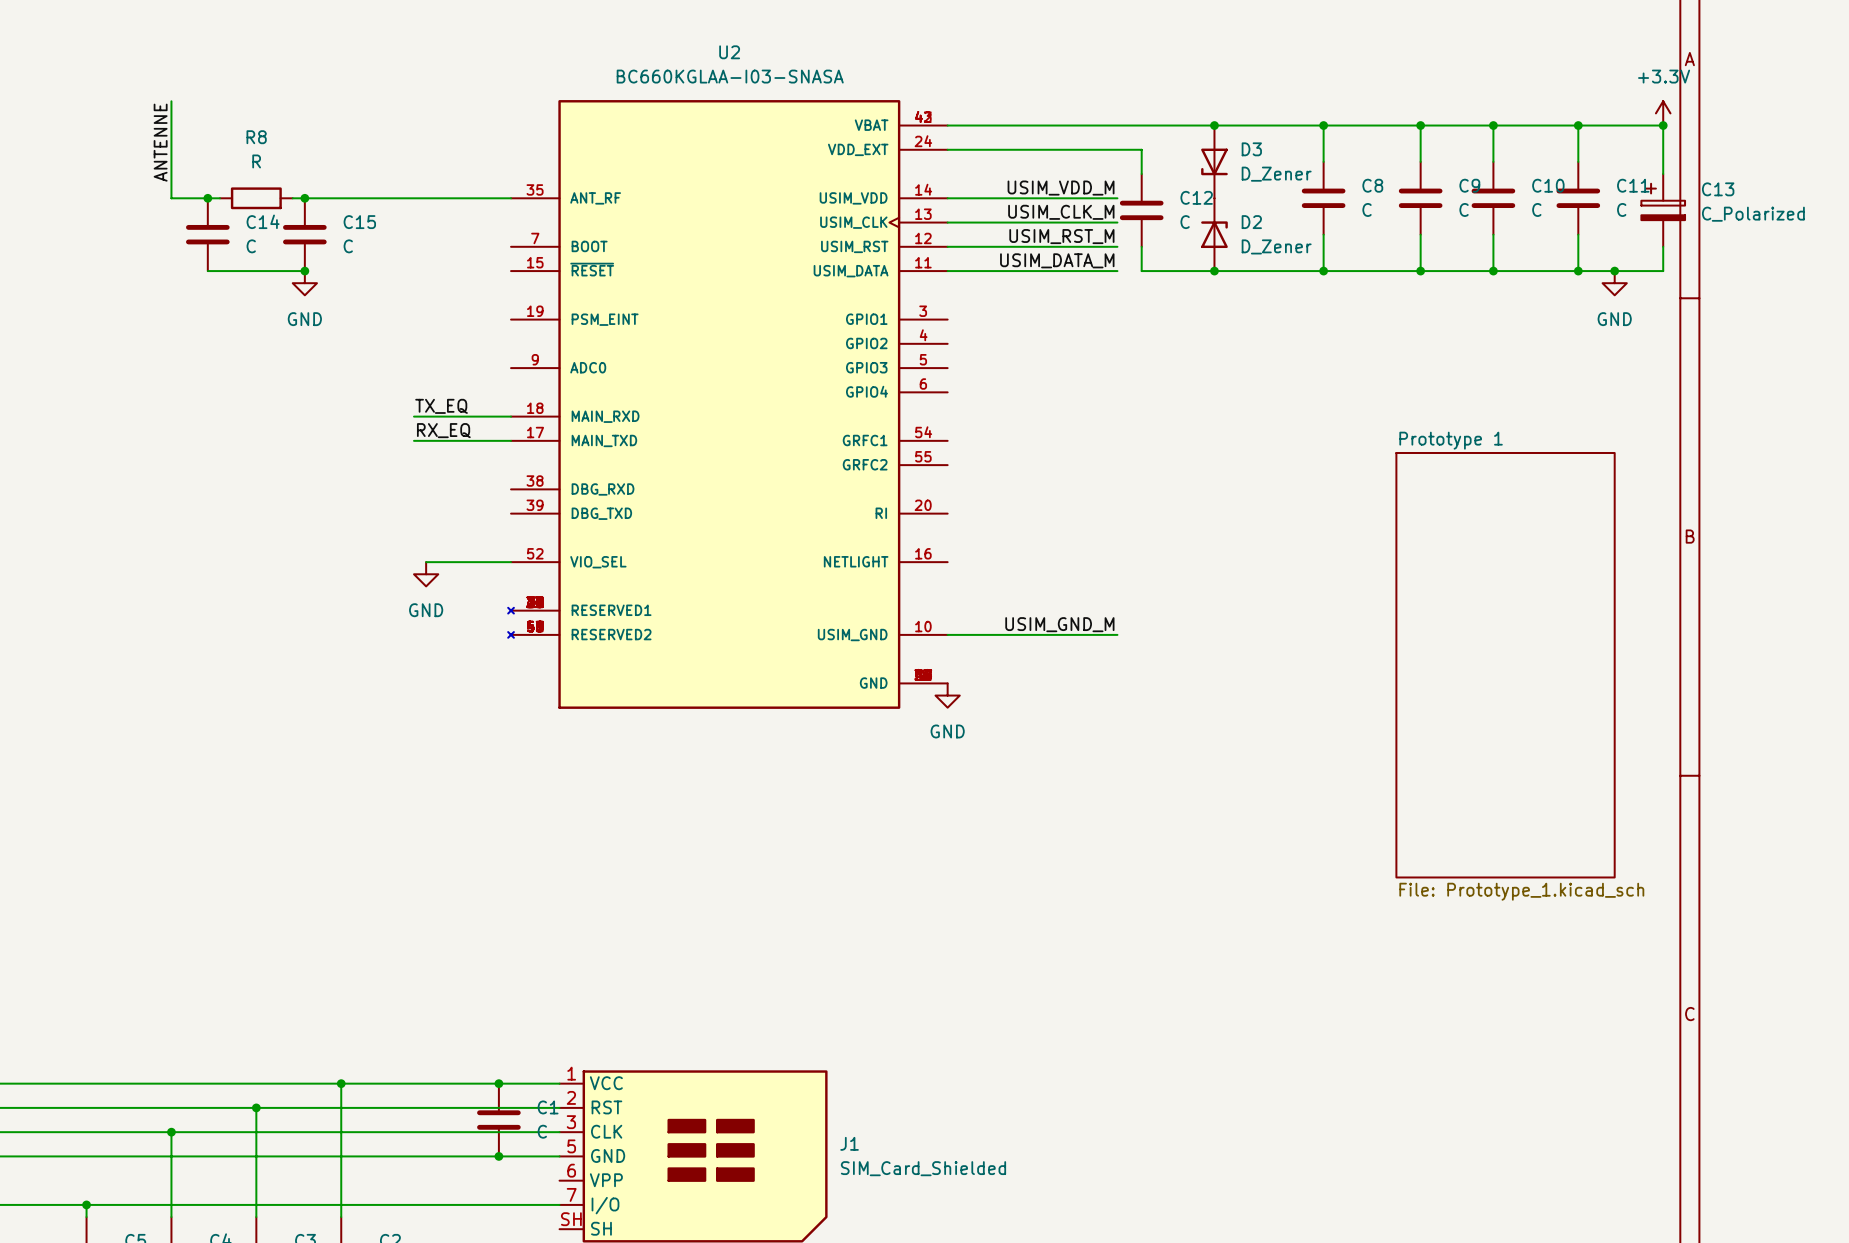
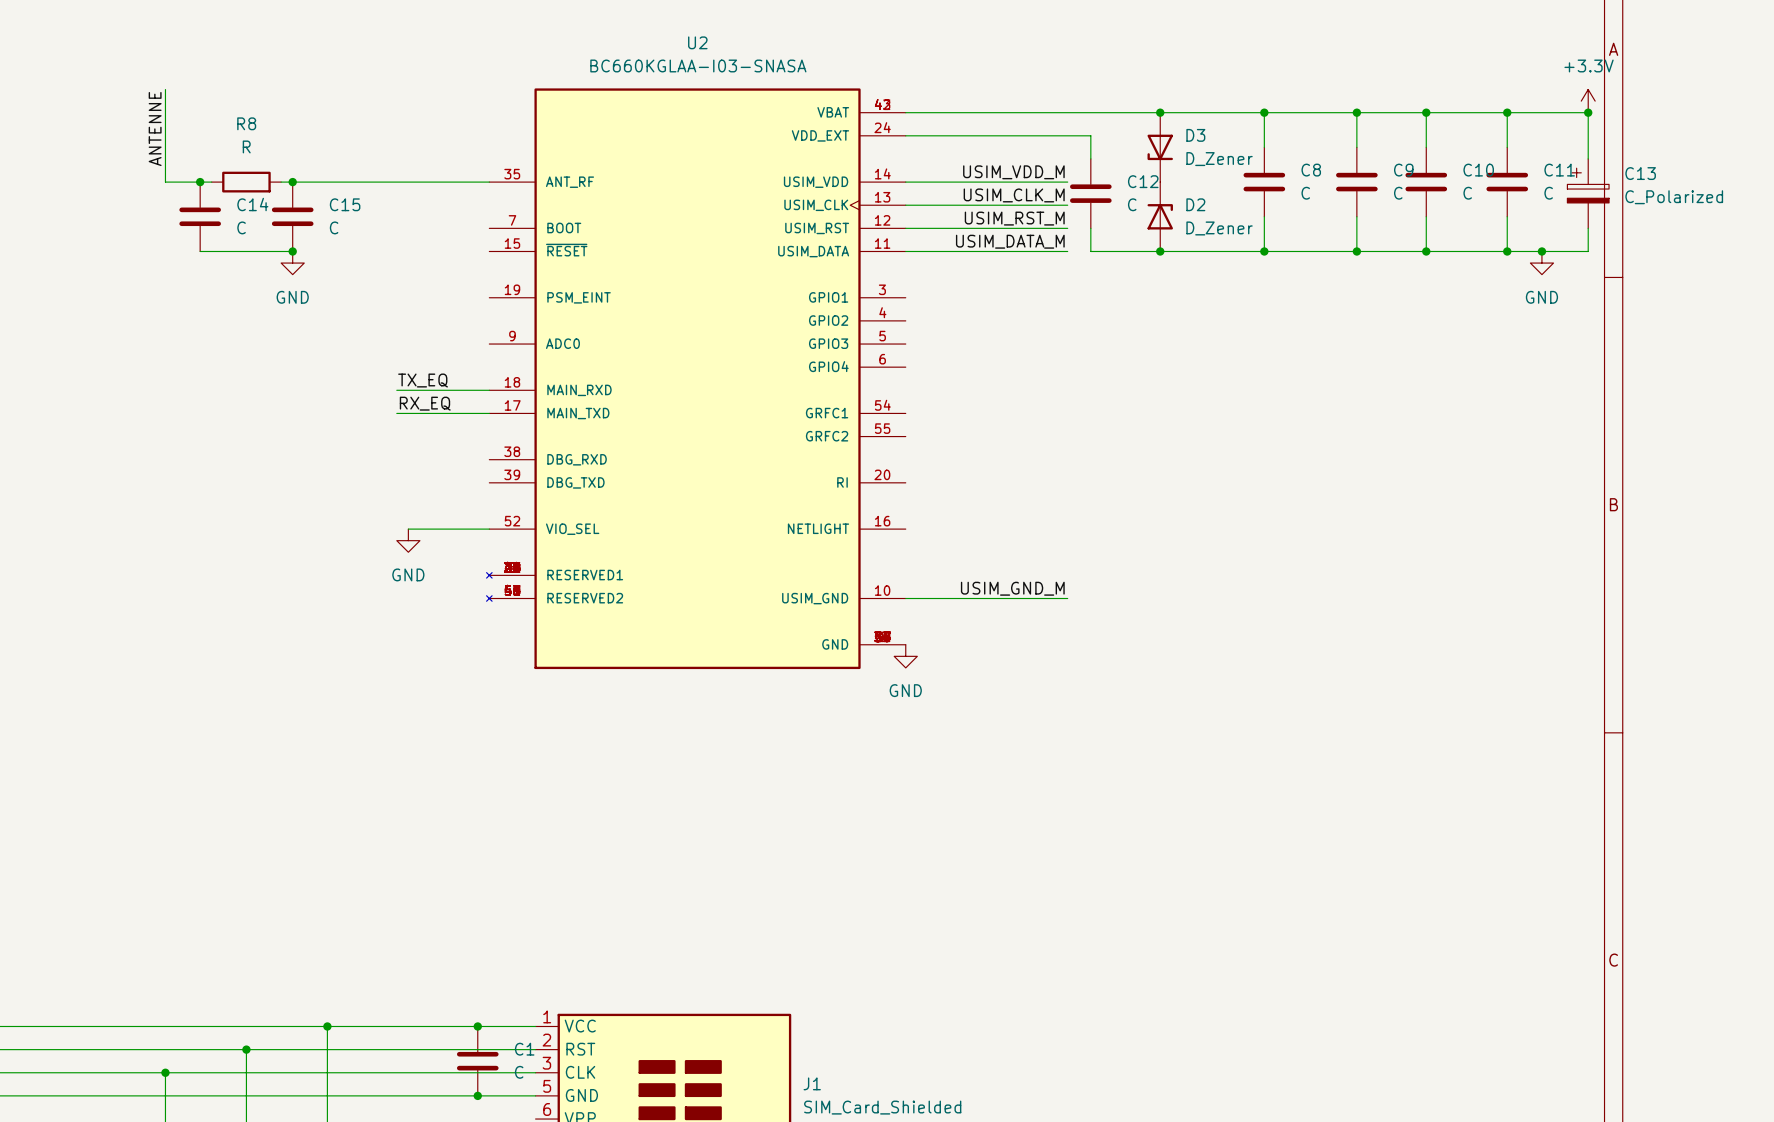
sheet Prototype 1: File: Prototype_1.kicad_sch (1505, 665) -> none

